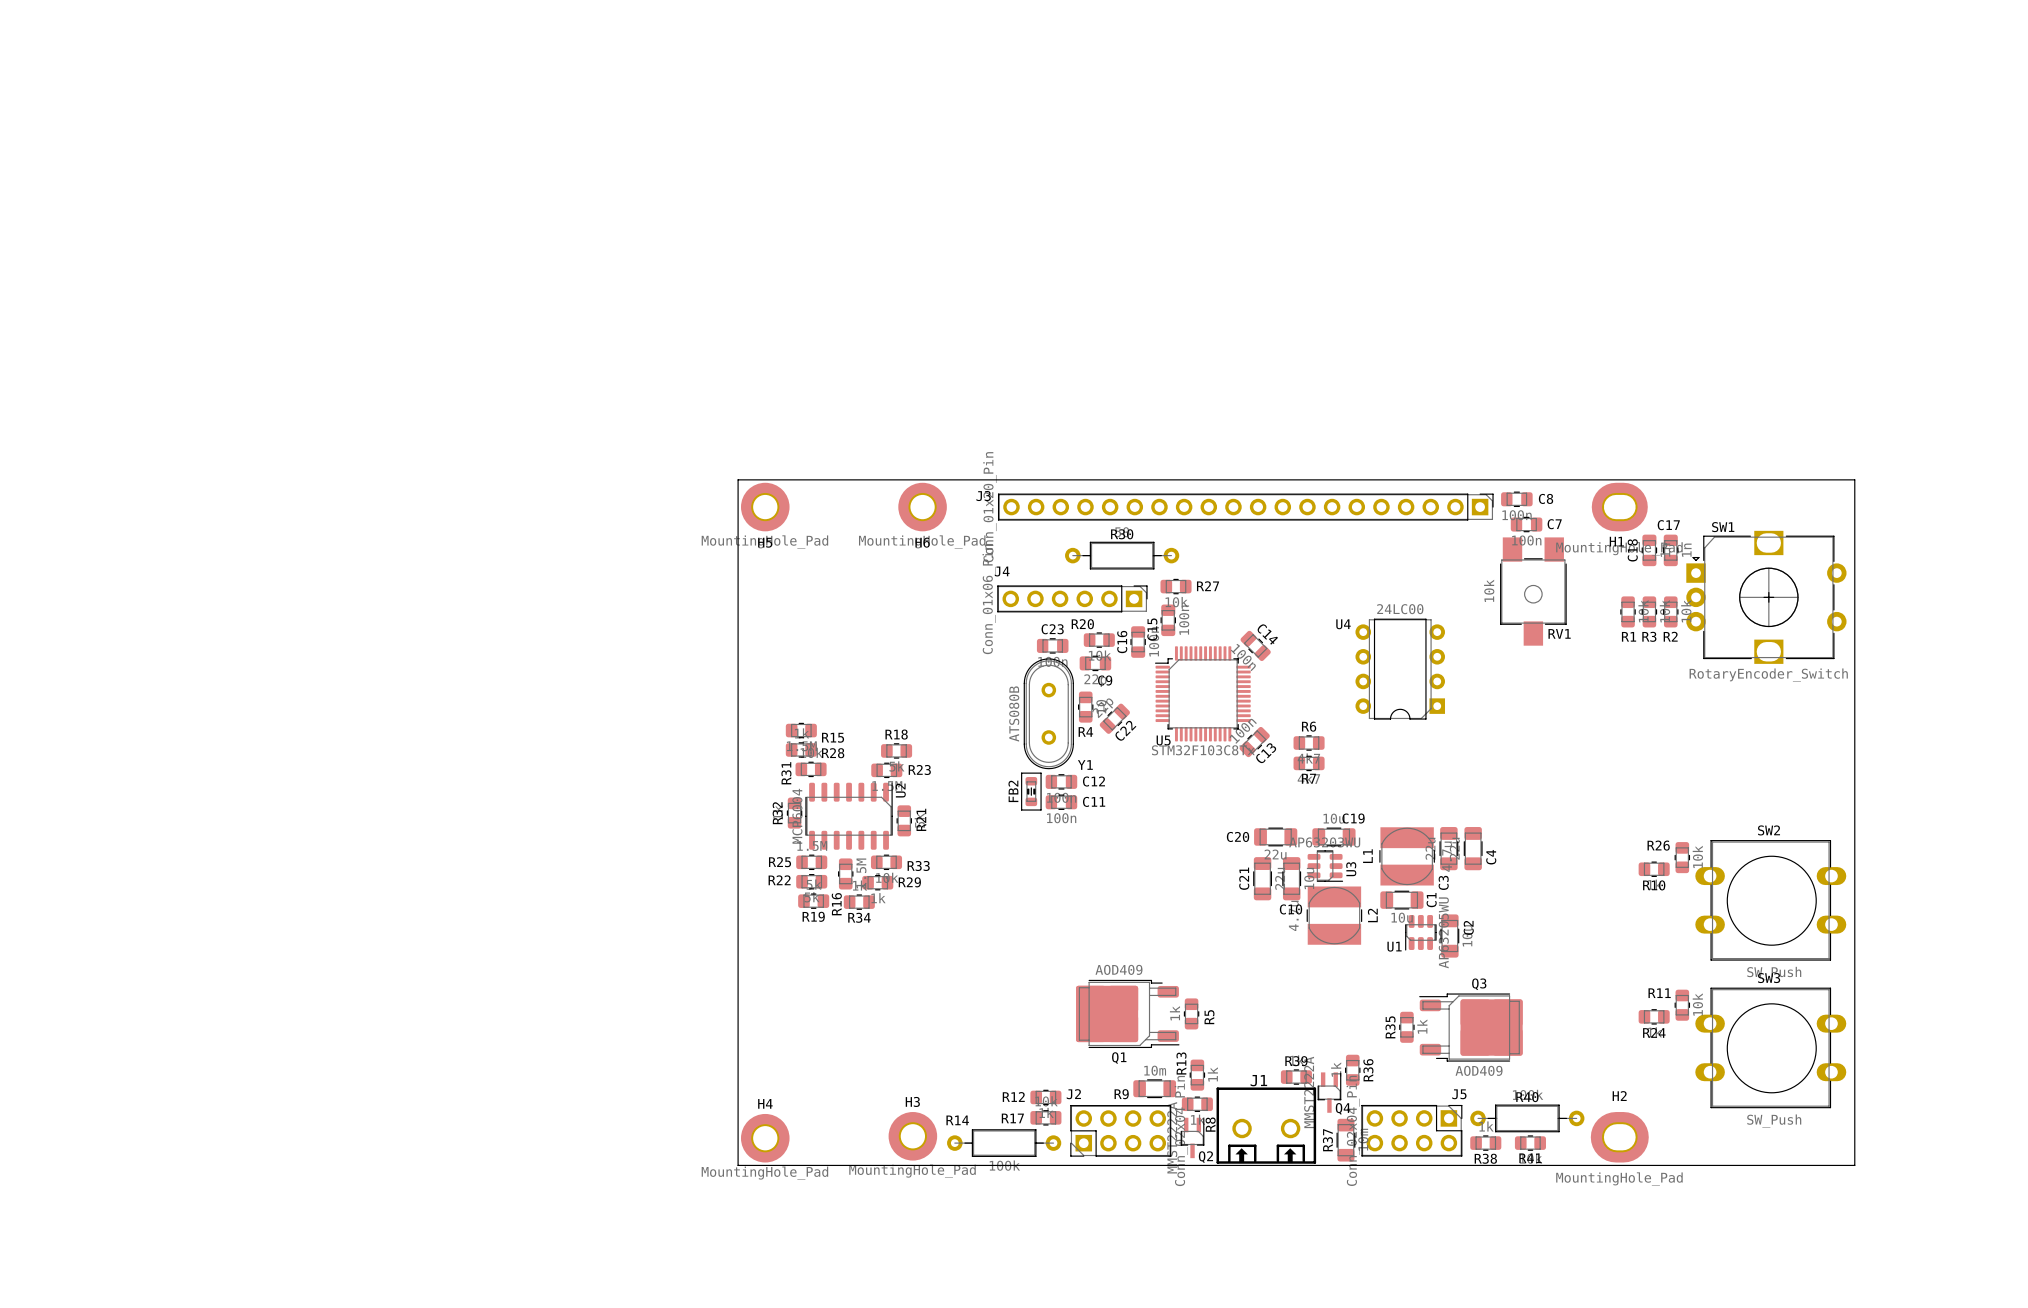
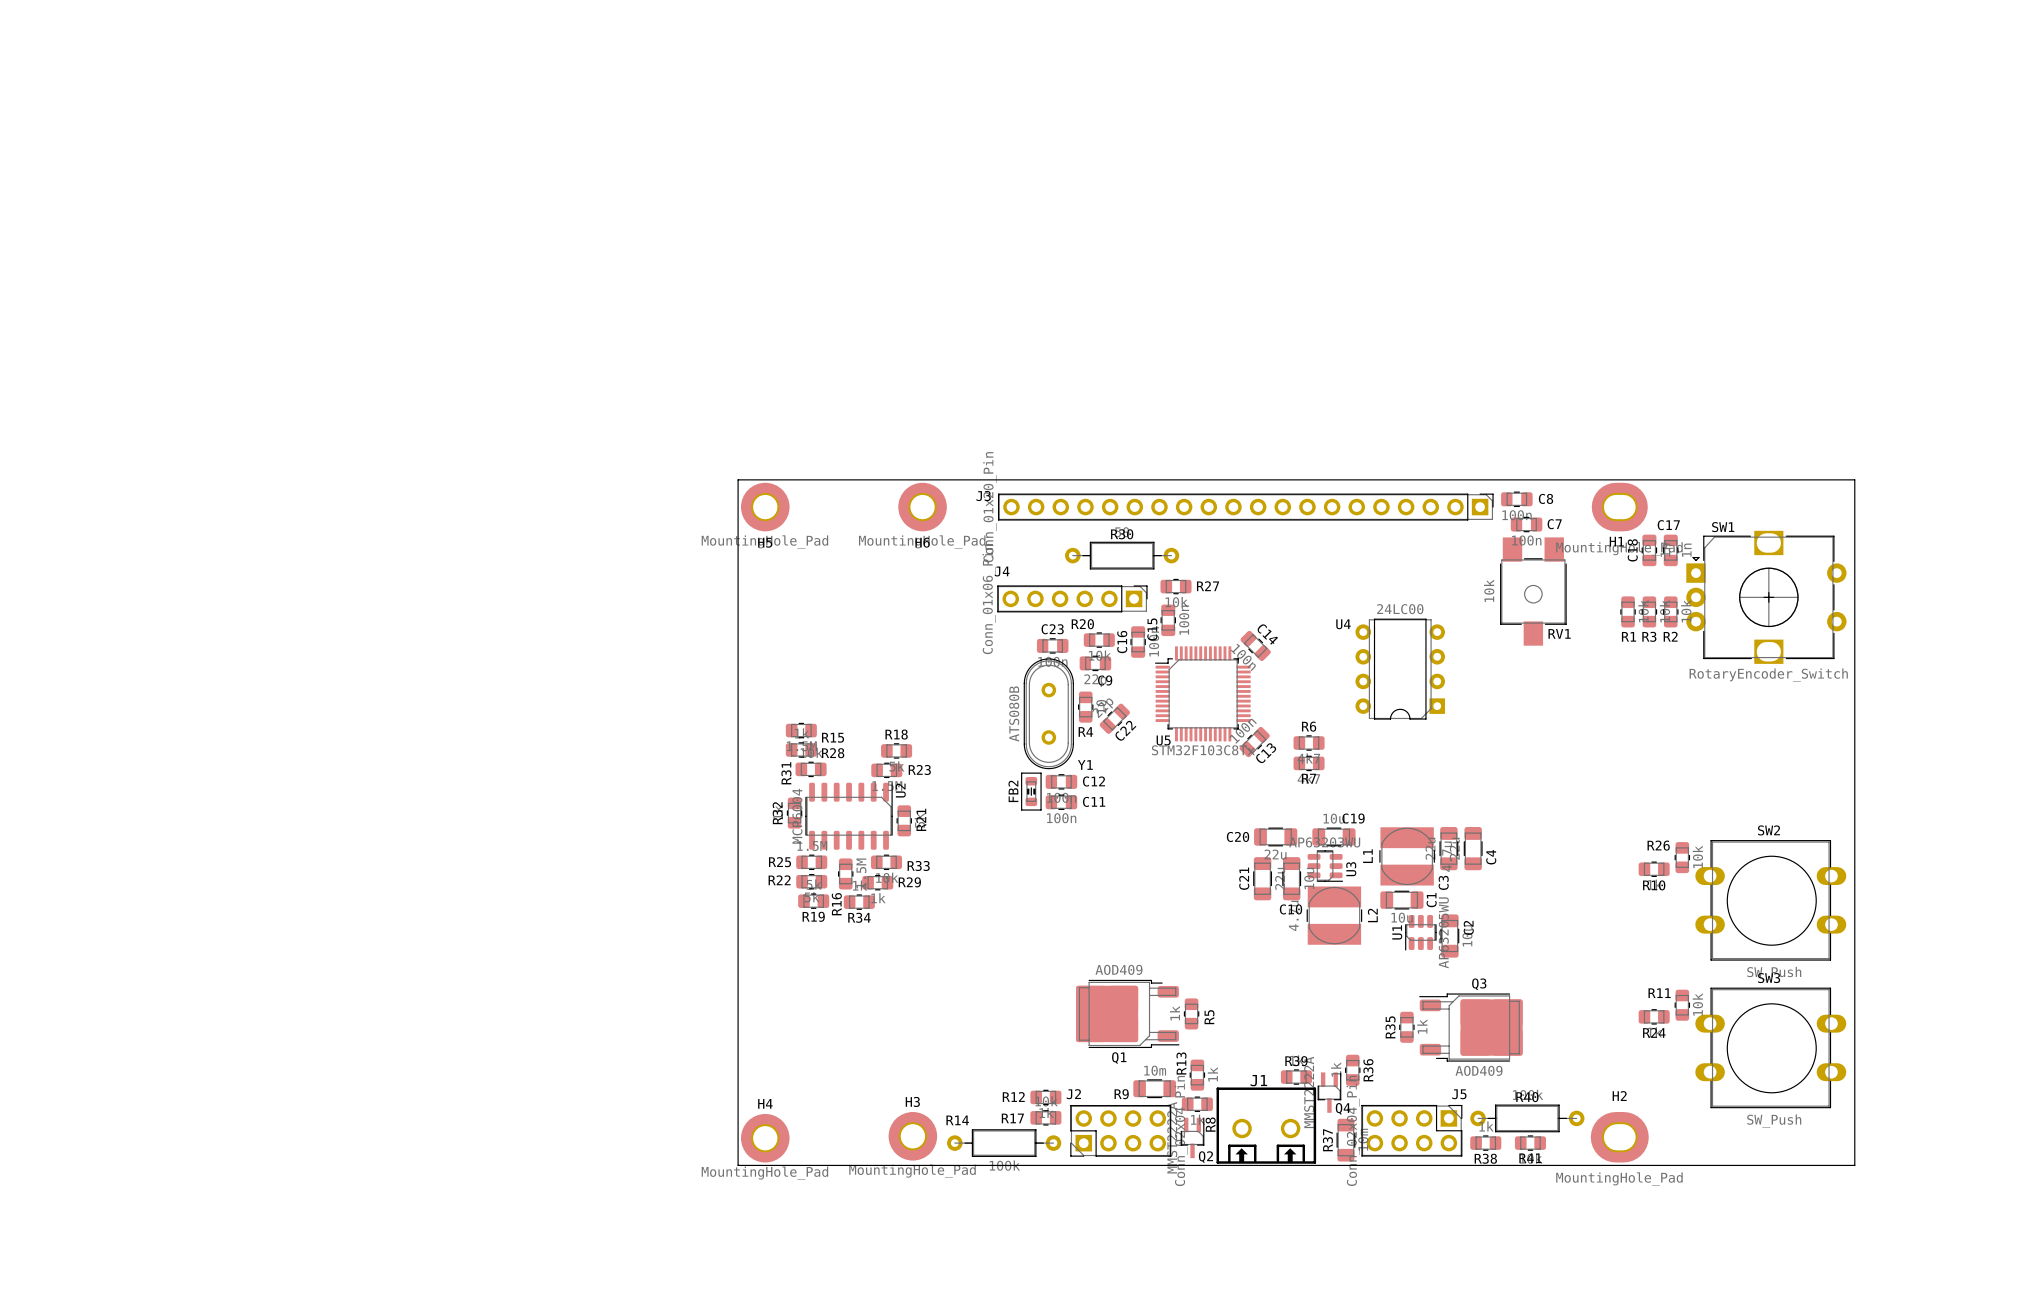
U1 name rotation: 0° (1394, 946) -> 90° counterclockwise (1397, 932)

